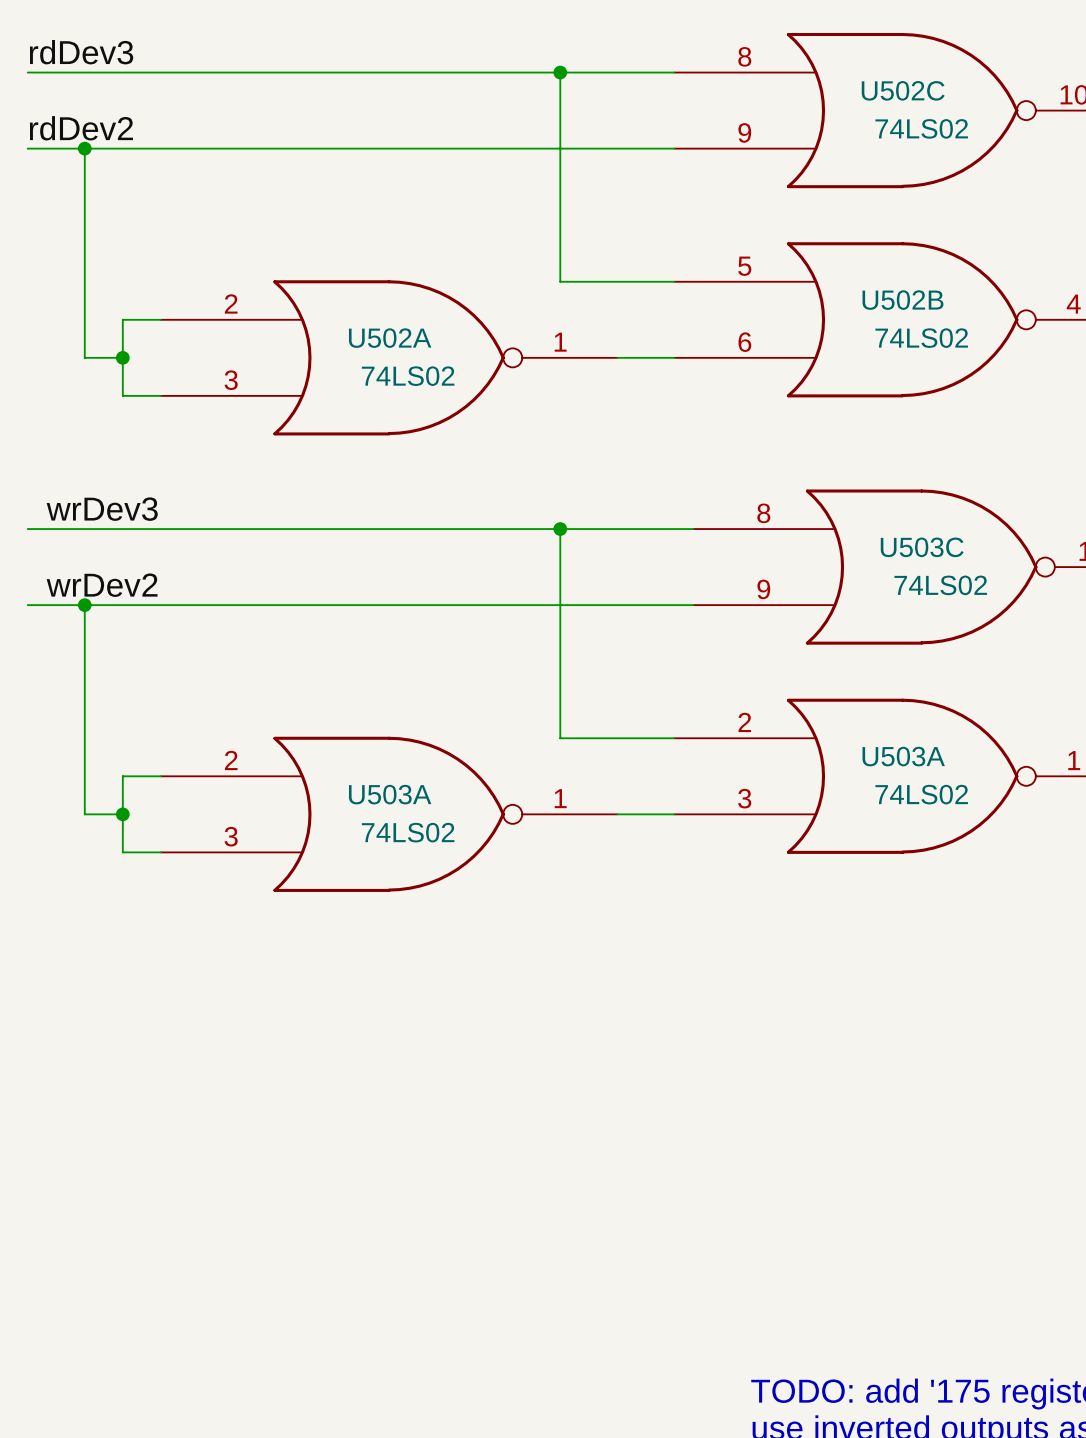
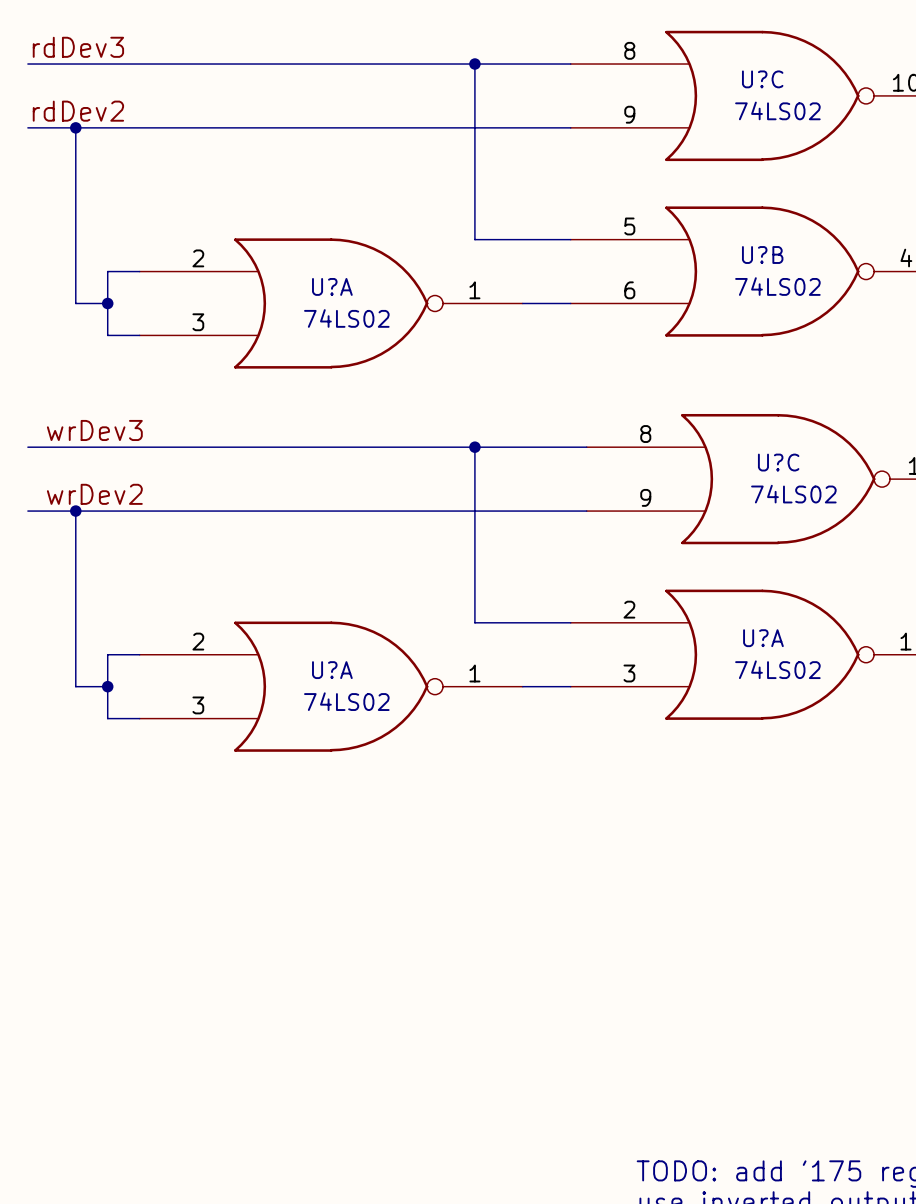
U502C name: U502C (903, 90) -> U?C (762, 79)
U502B name: U502B (903, 300) -> U?B (762, 255)
U502A name: U502A (390, 338) -> U?A (332, 286)
U503C name: U503C (922, 547) -> U?C (778, 462)
U503A name: U503A (903, 756) -> U?A (763, 638)
U503A name: U503A (390, 794) -> U?A (332, 670)

